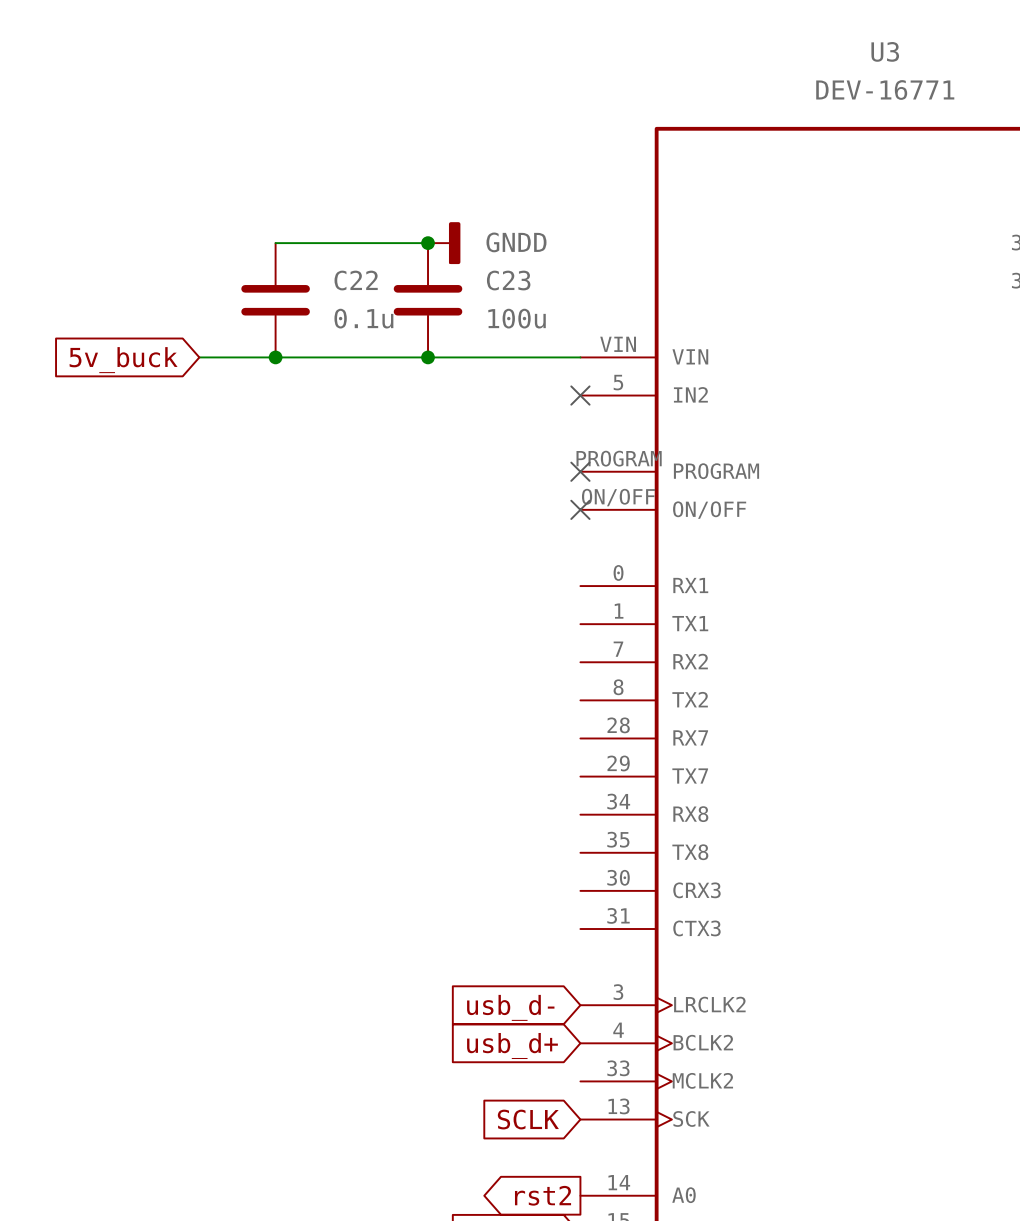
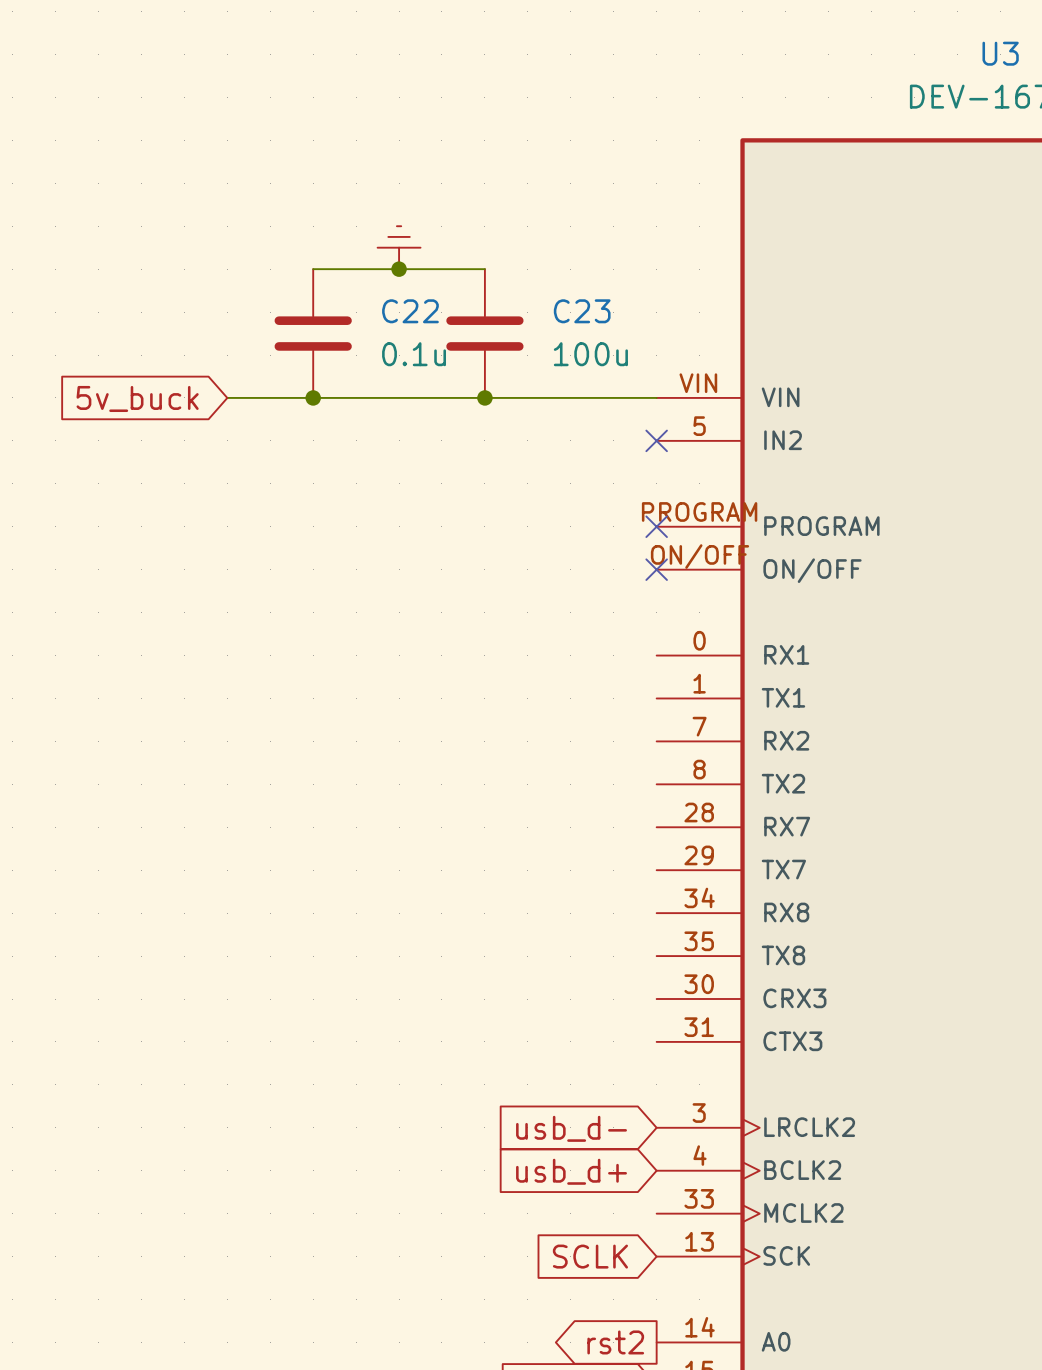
power symbol: none -> (399, 247)
junction position: (428, 243) -> (399, 269)
power symbol: GNDD (444, 243) -> none

